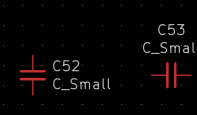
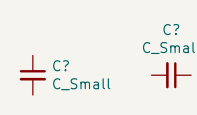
C53 name: C53 (171, 29) -> C? (171, 29)
C52 name: C52 (66, 65) -> C? (61, 65)

